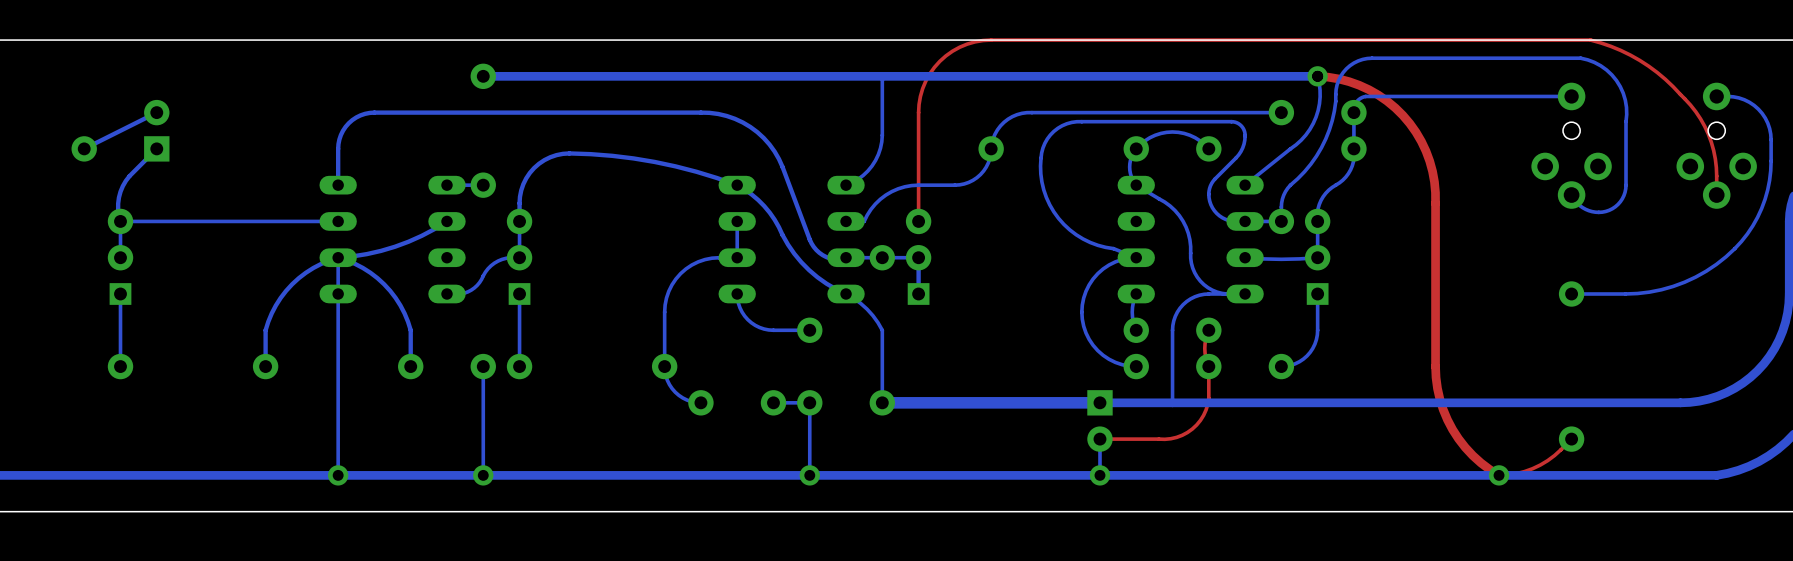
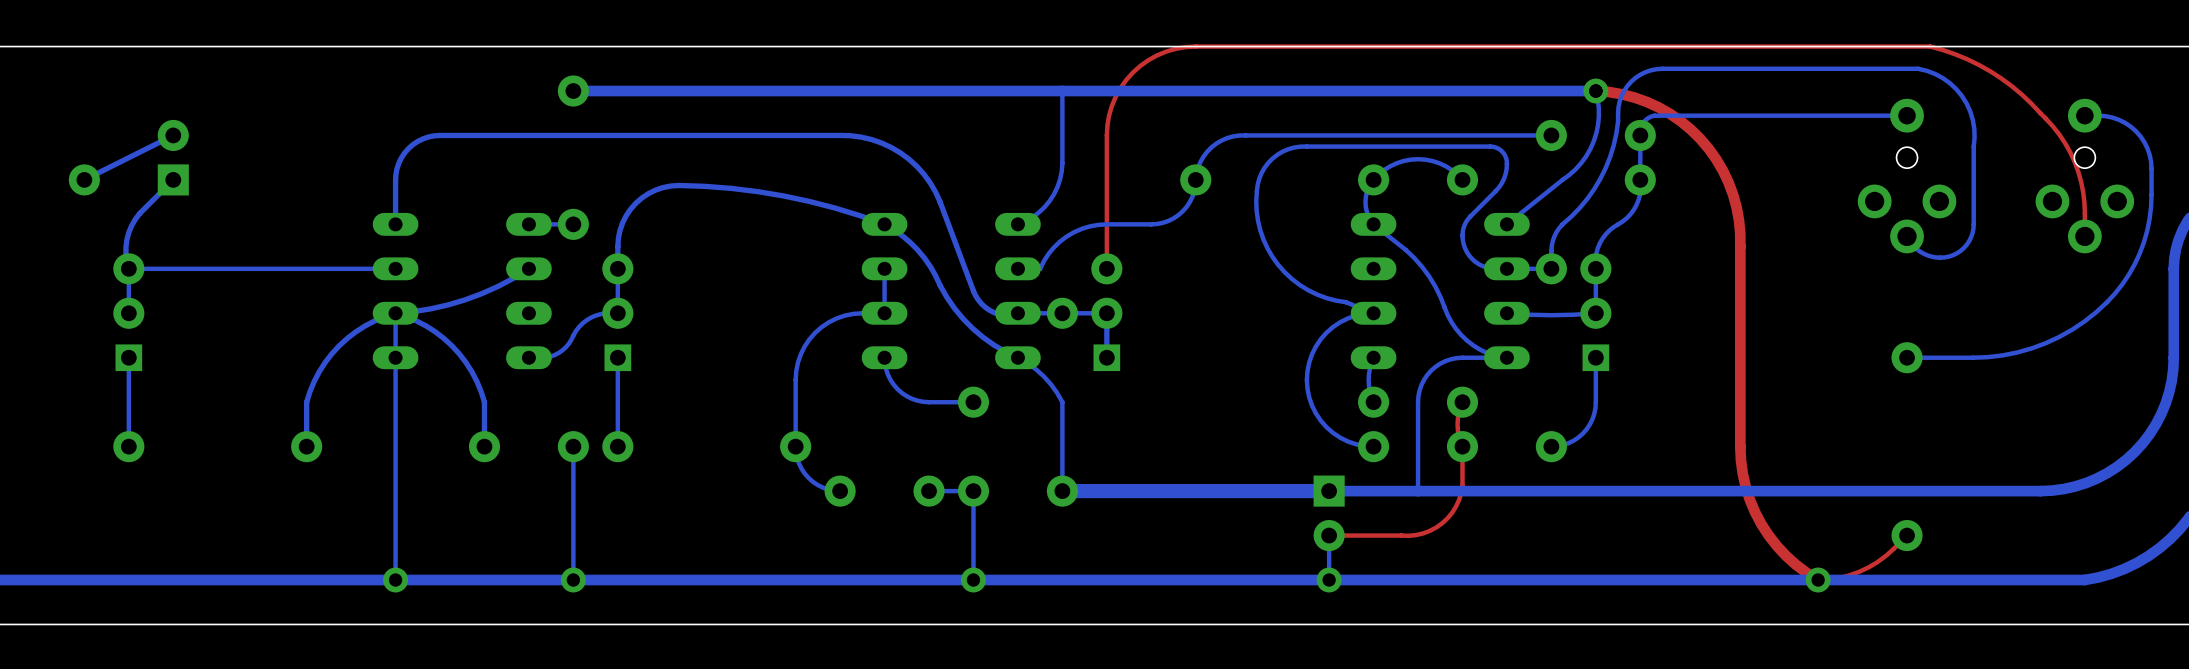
bottom track: (1136, 185) (1164, 202) (1179, 215) (1188, 233) (1191, 263) (1197, 277) (1207, 287) (1226, 293) -> (1373, 224) (1405, 249) (1422, 266) (1435, 286) (1451, 322) (1461, 334) (1480, 349) (1502, 357)

